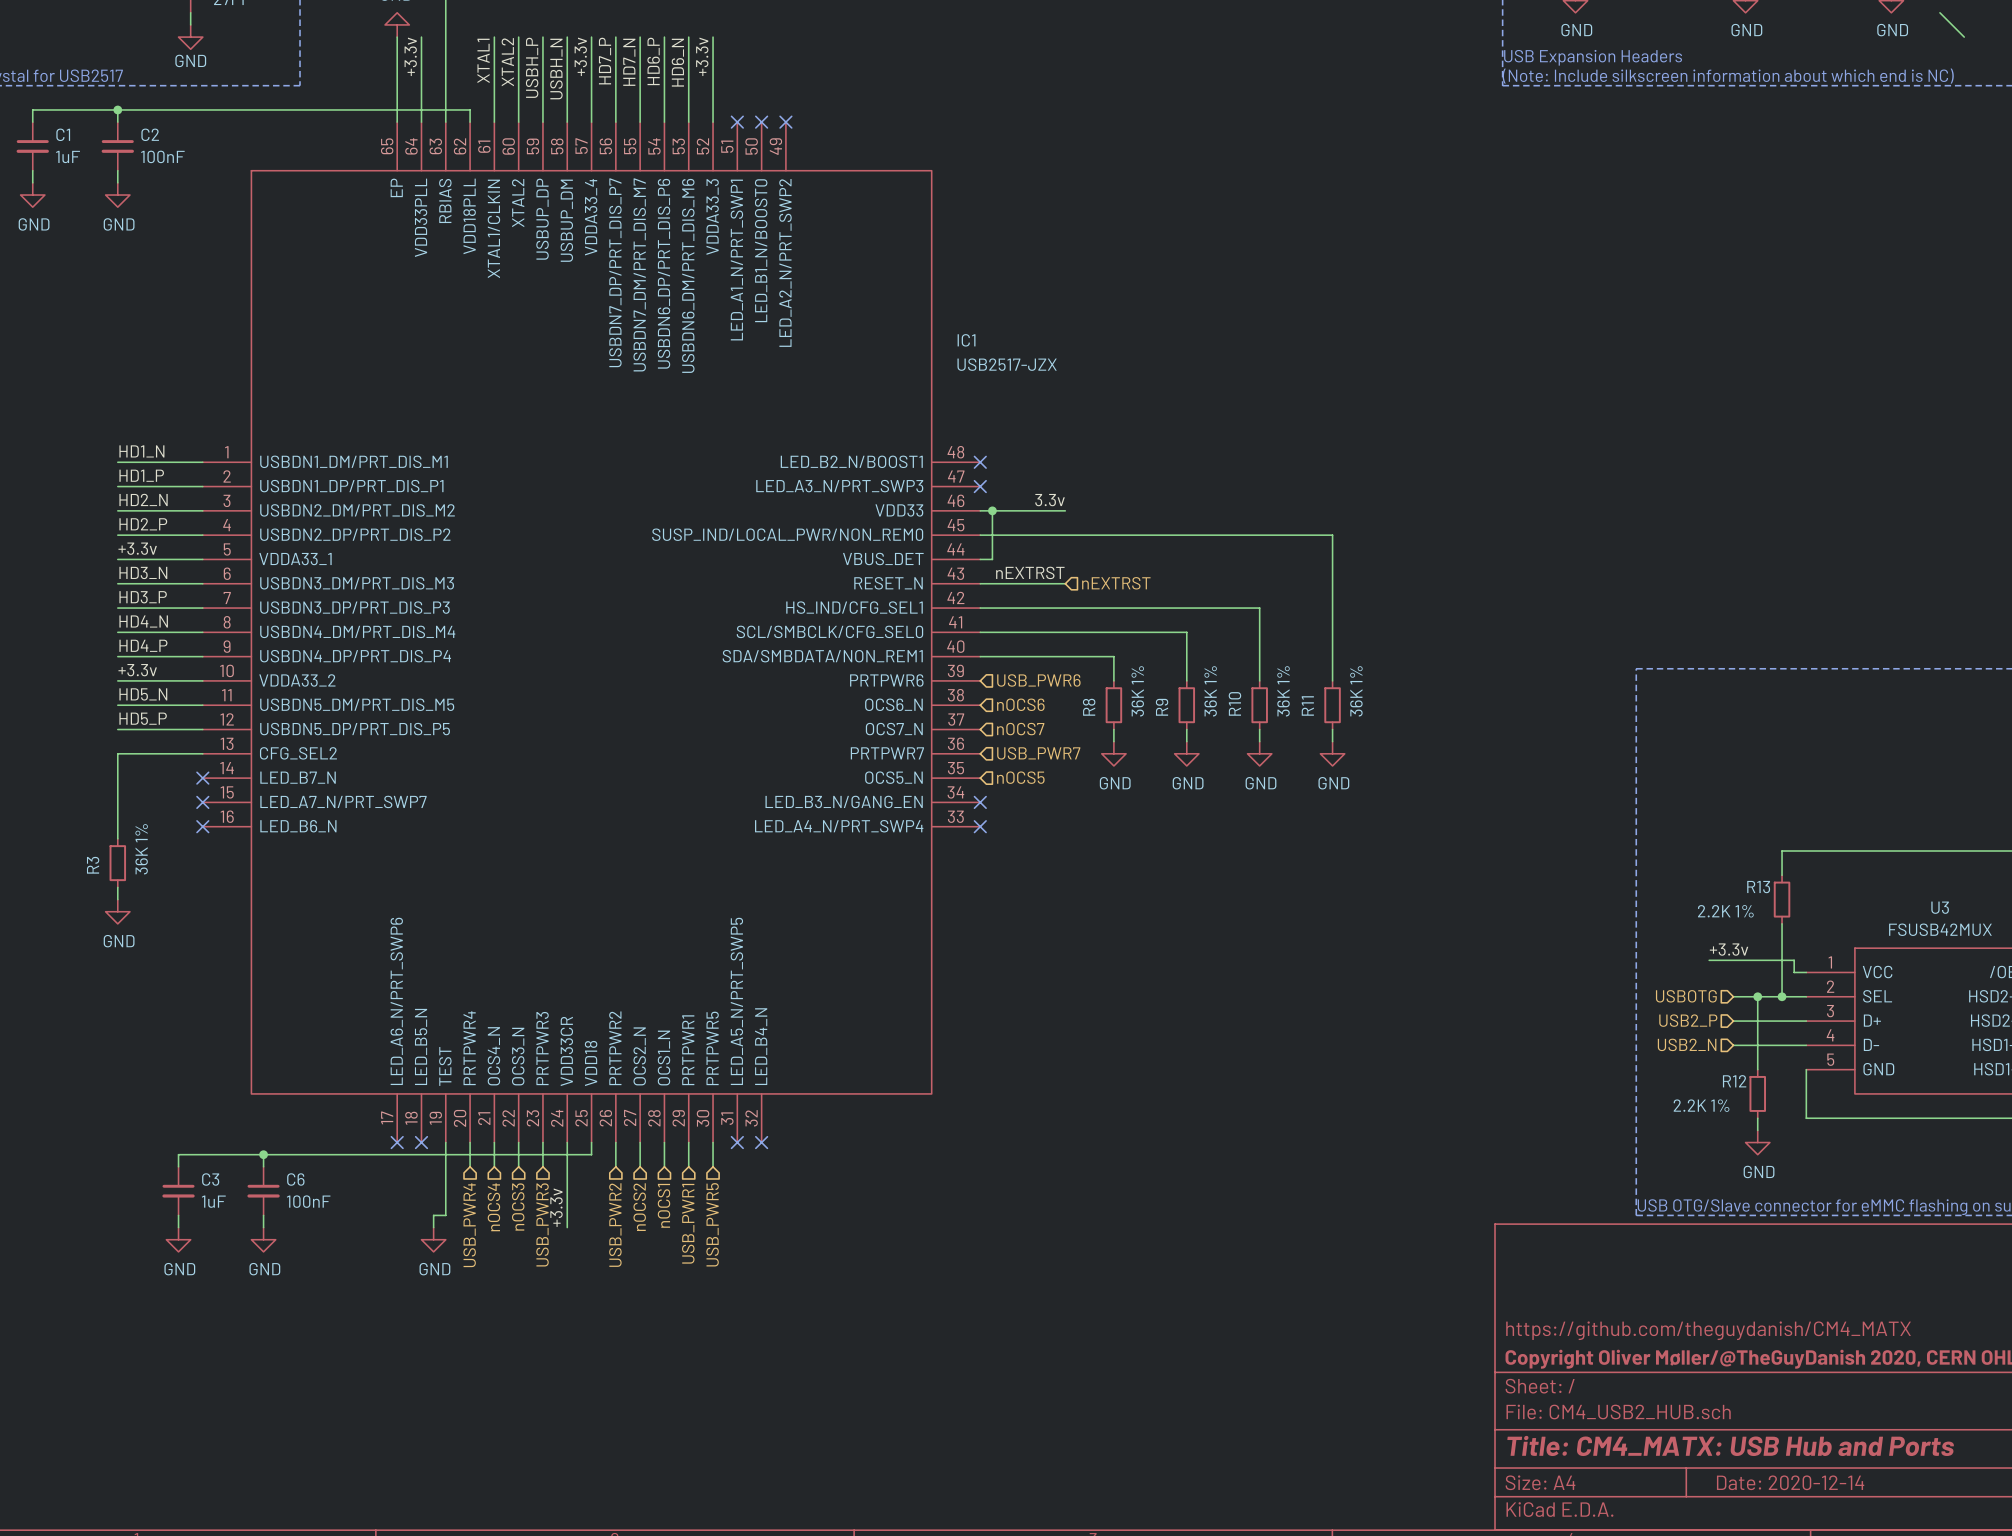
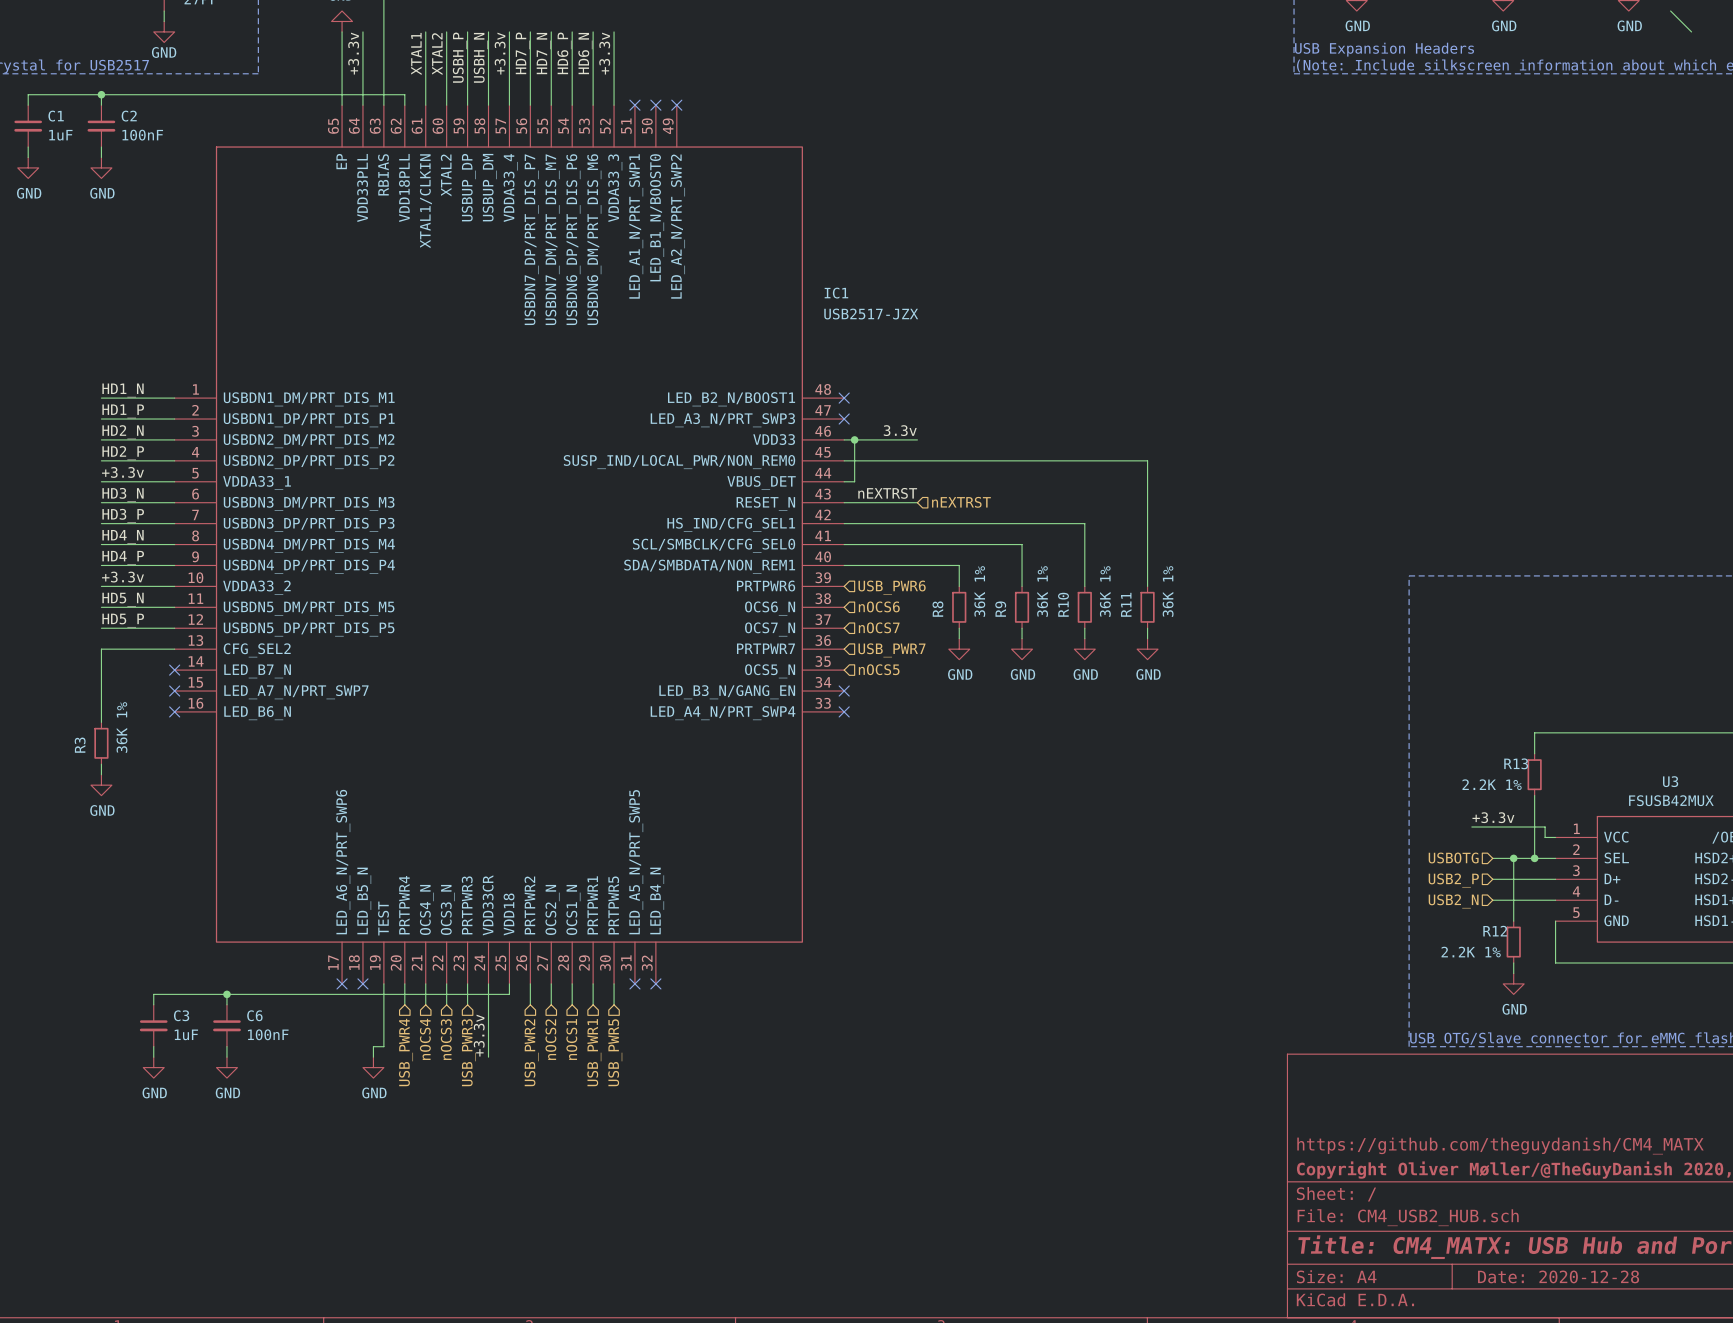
title block: Date: 2020-12-14 (1790, 1482) -> Date: 2020-12-28 (1558, 1276)

